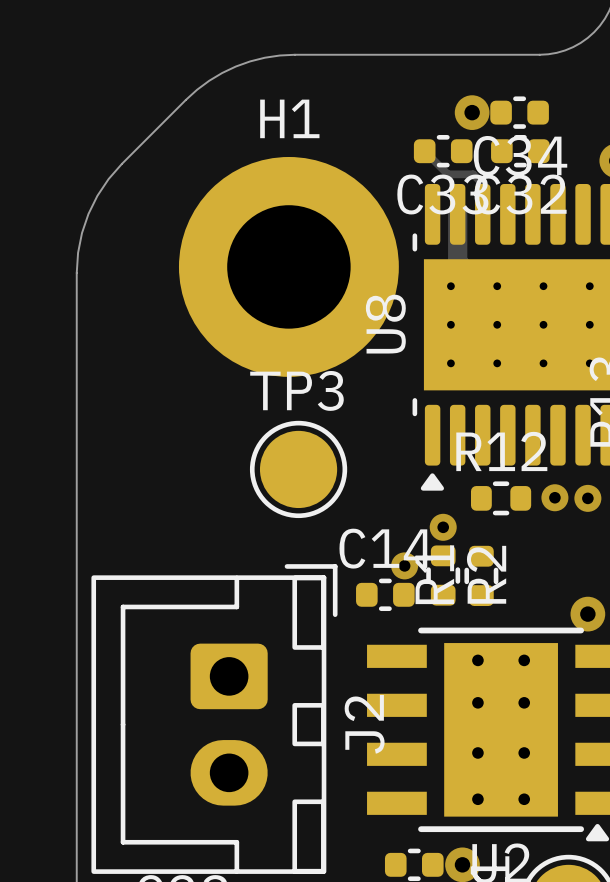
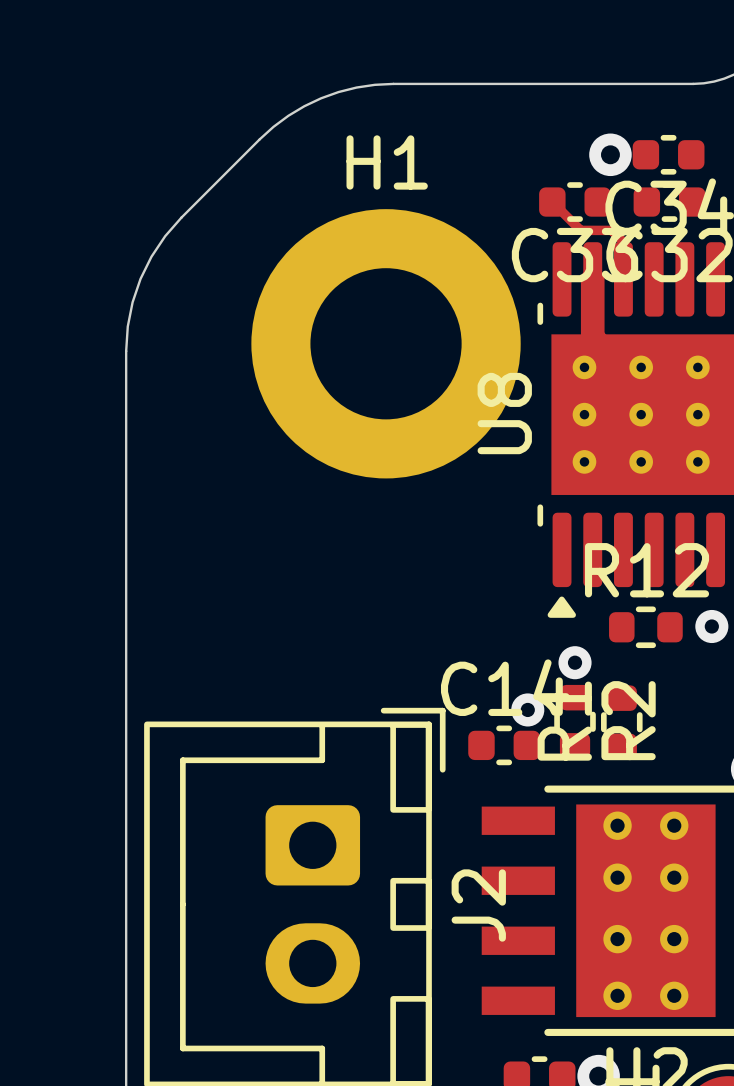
TP3: (298, 469) -> none

